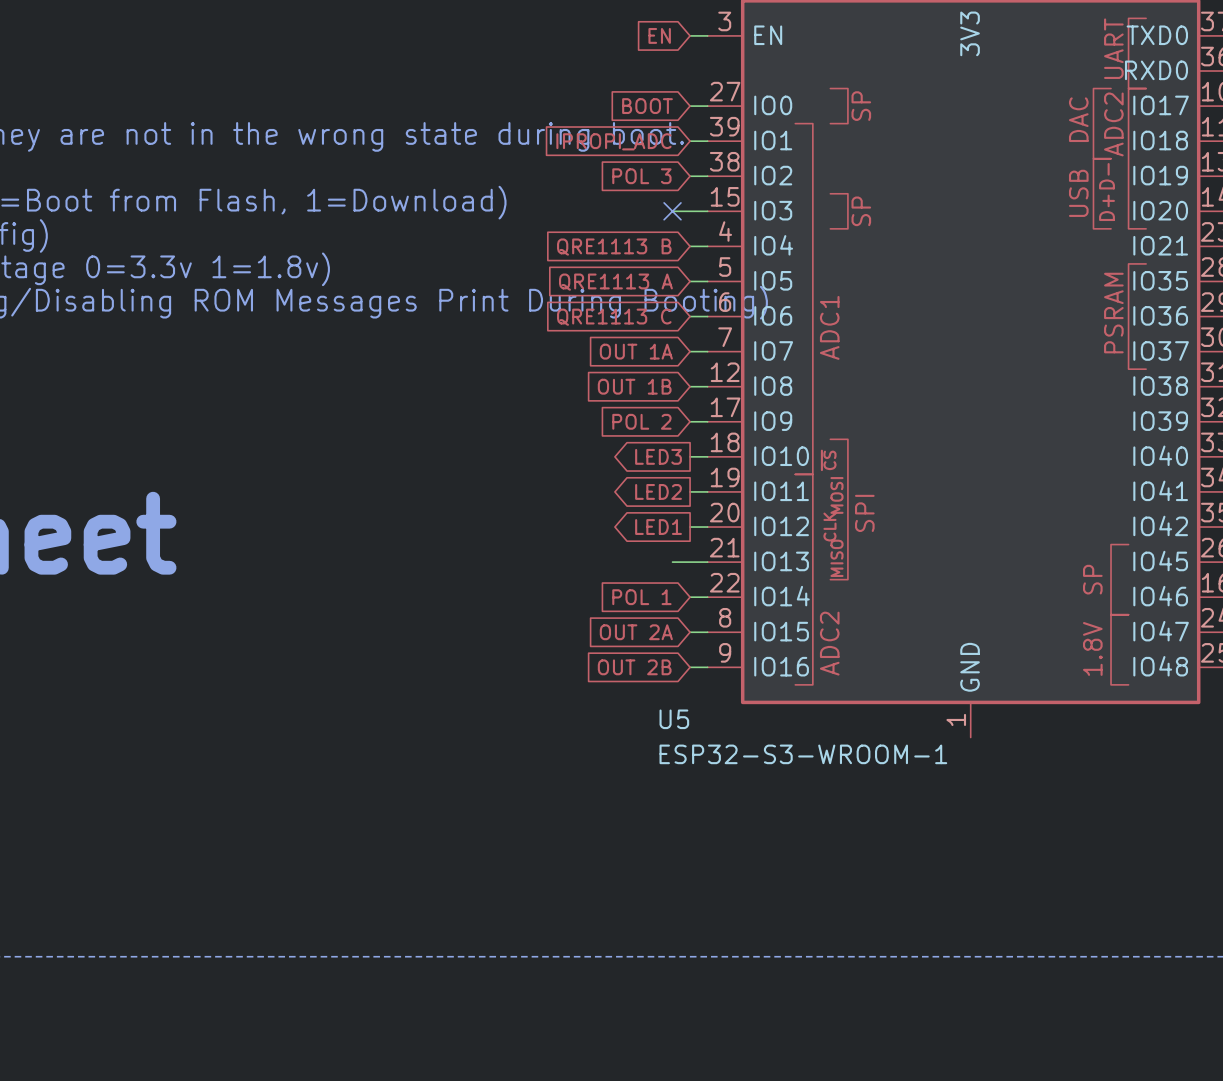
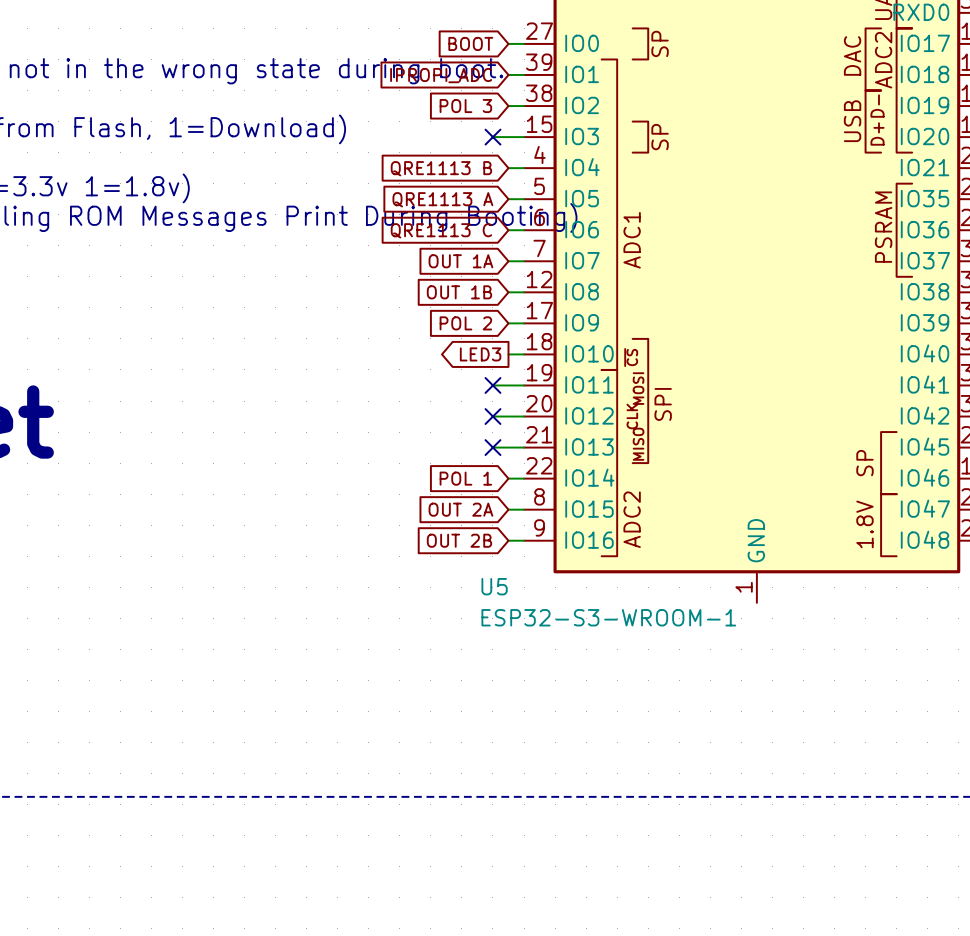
global label: LED2 (658, 491) -> none
wire: none -> (492, 385) (508, 385)
no-connect mark: none -> (492, 385)
global label: LED1 (658, 527) -> none
wire: none -> (492, 416) (508, 416)
no-connect mark: none -> (492, 416)
no-connect mark: none -> (492, 447)

